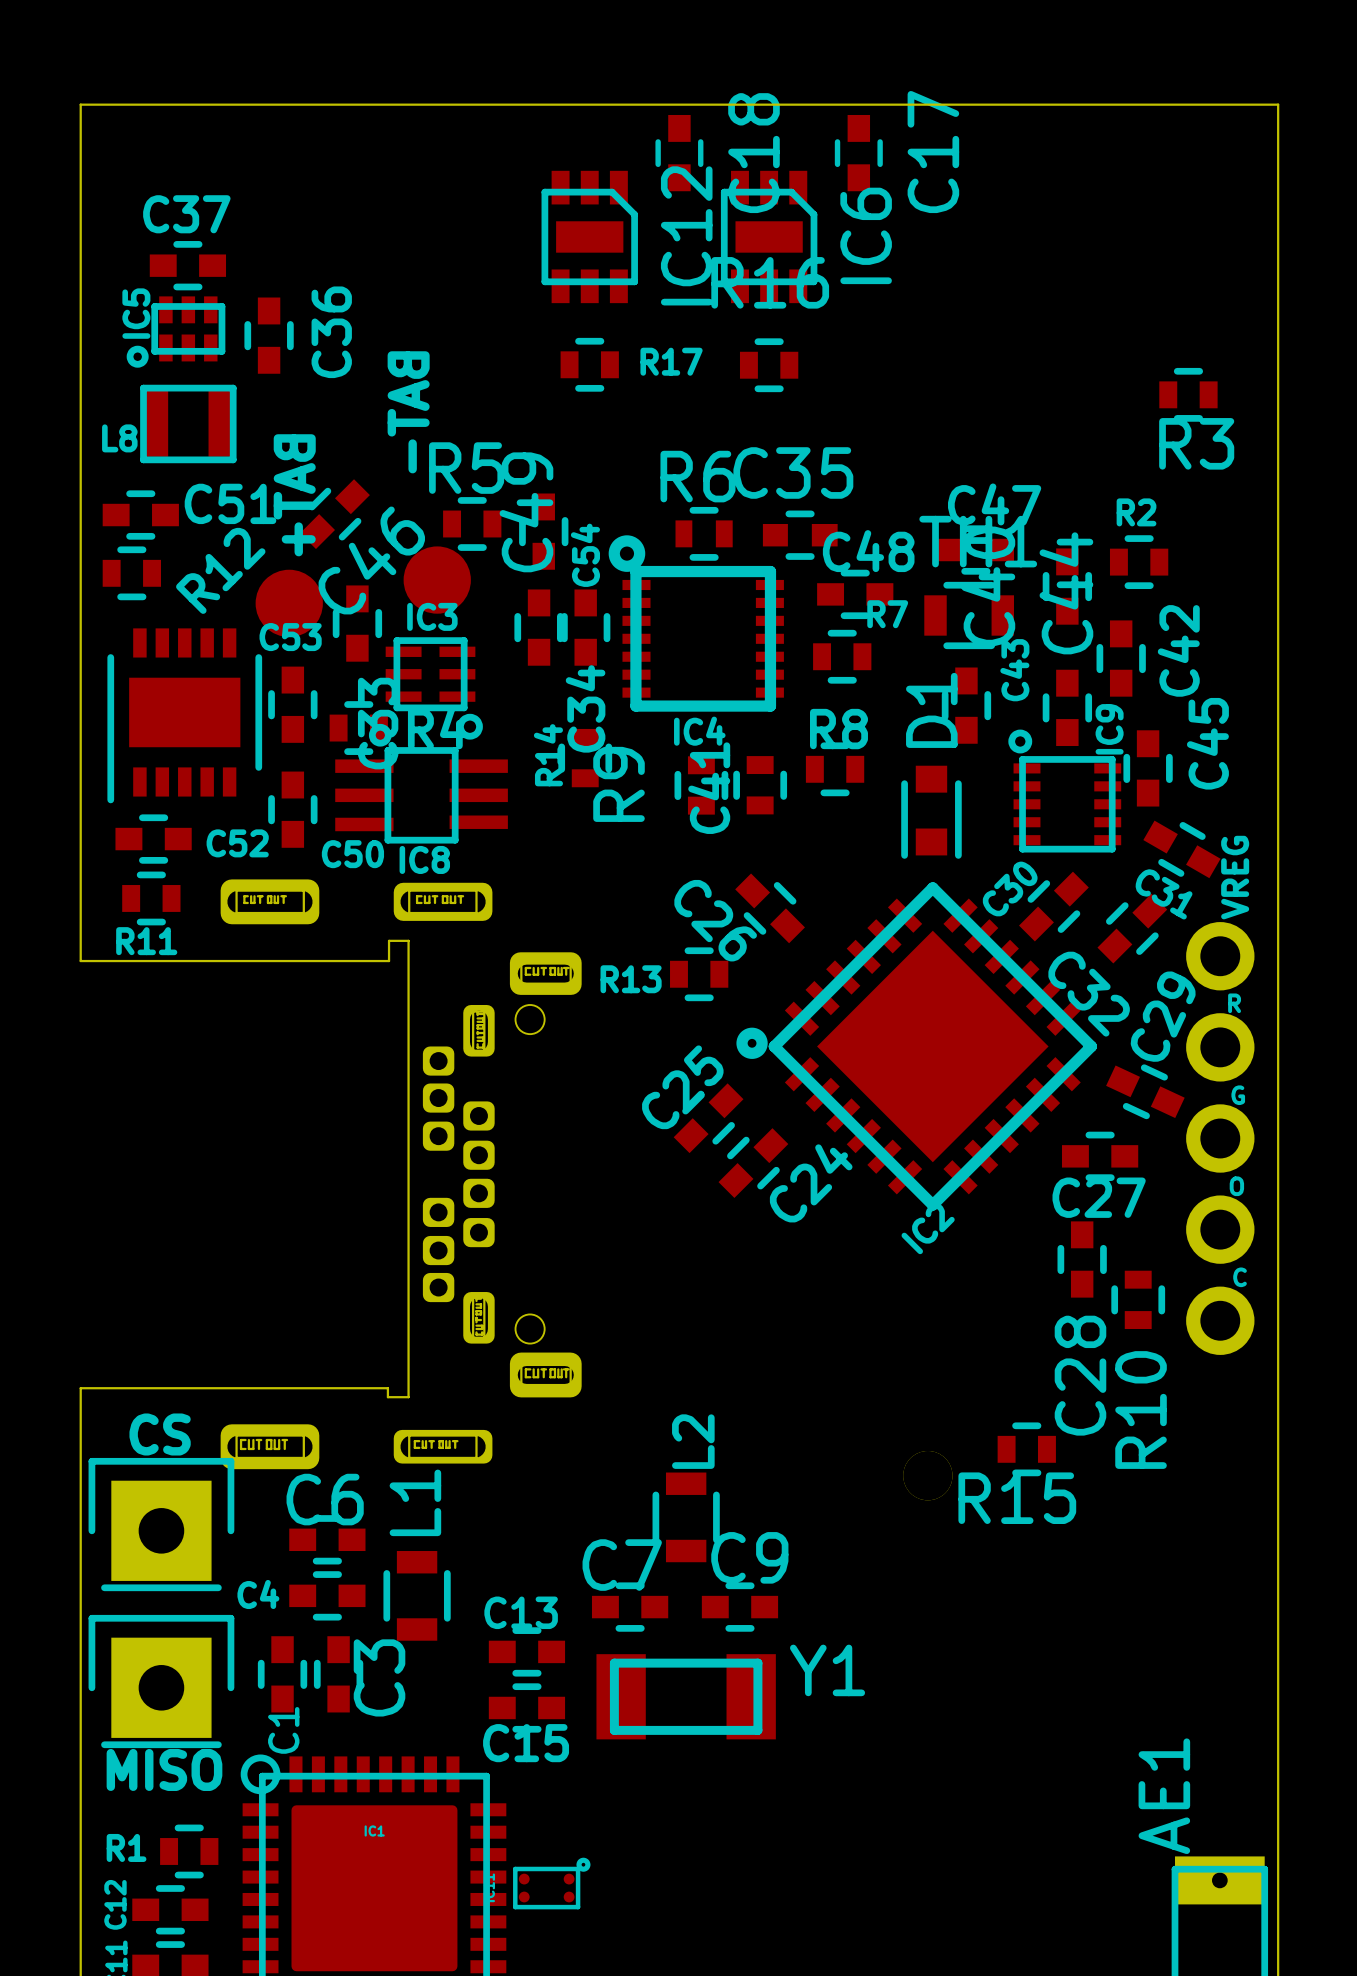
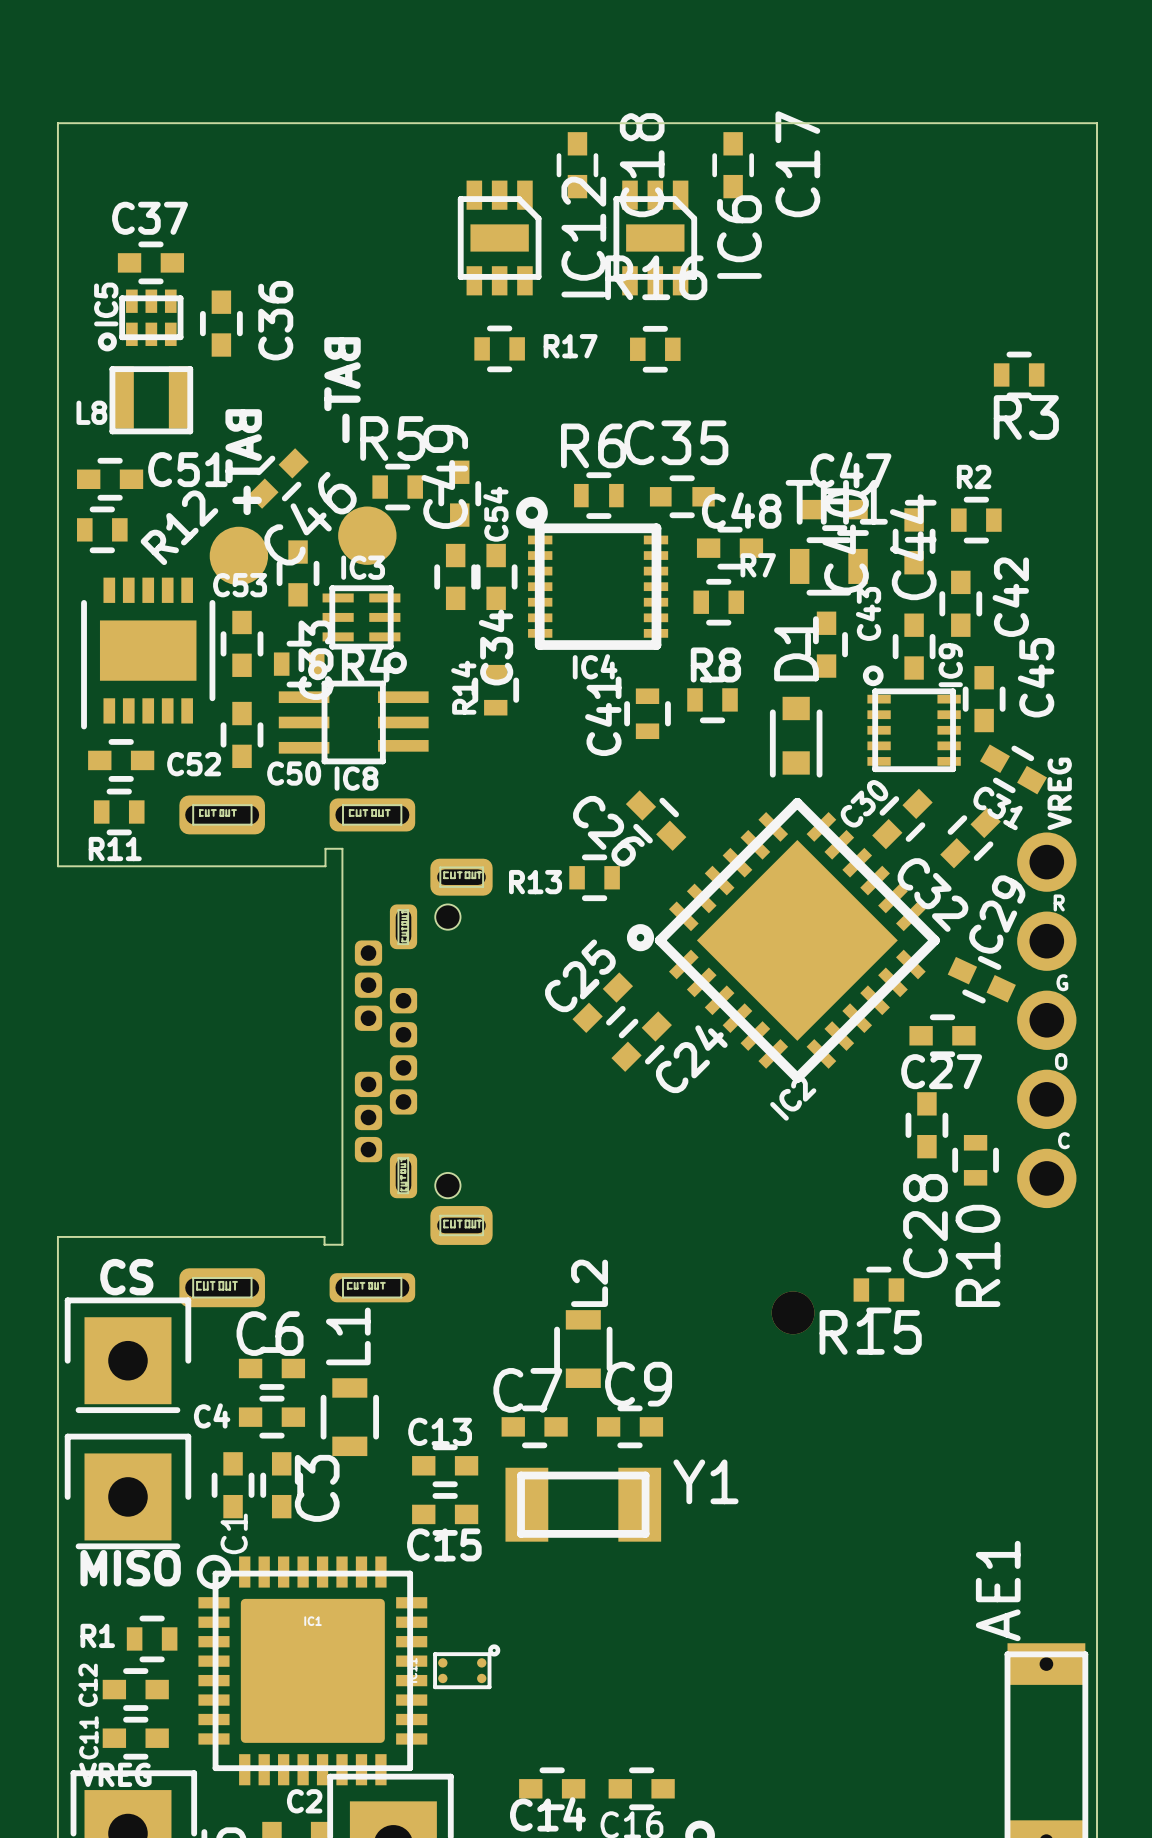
R9: (701, 785) -> none

